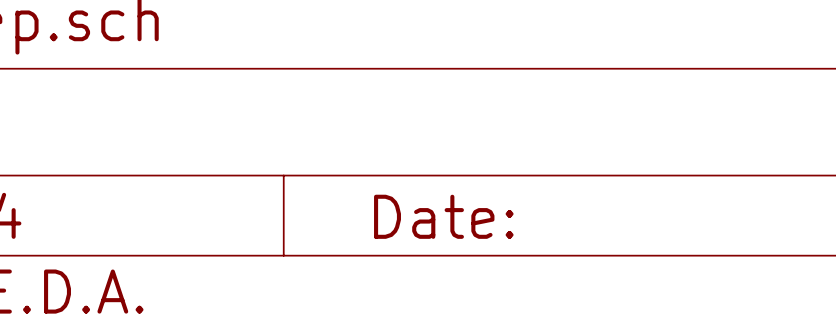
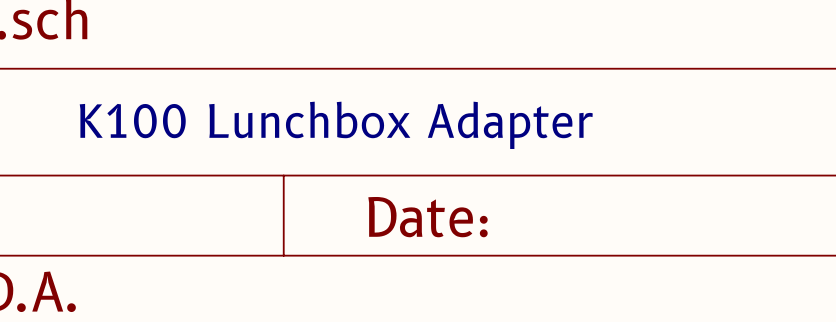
text: none -> K100 Lunchbox Adapter (336, 125)

